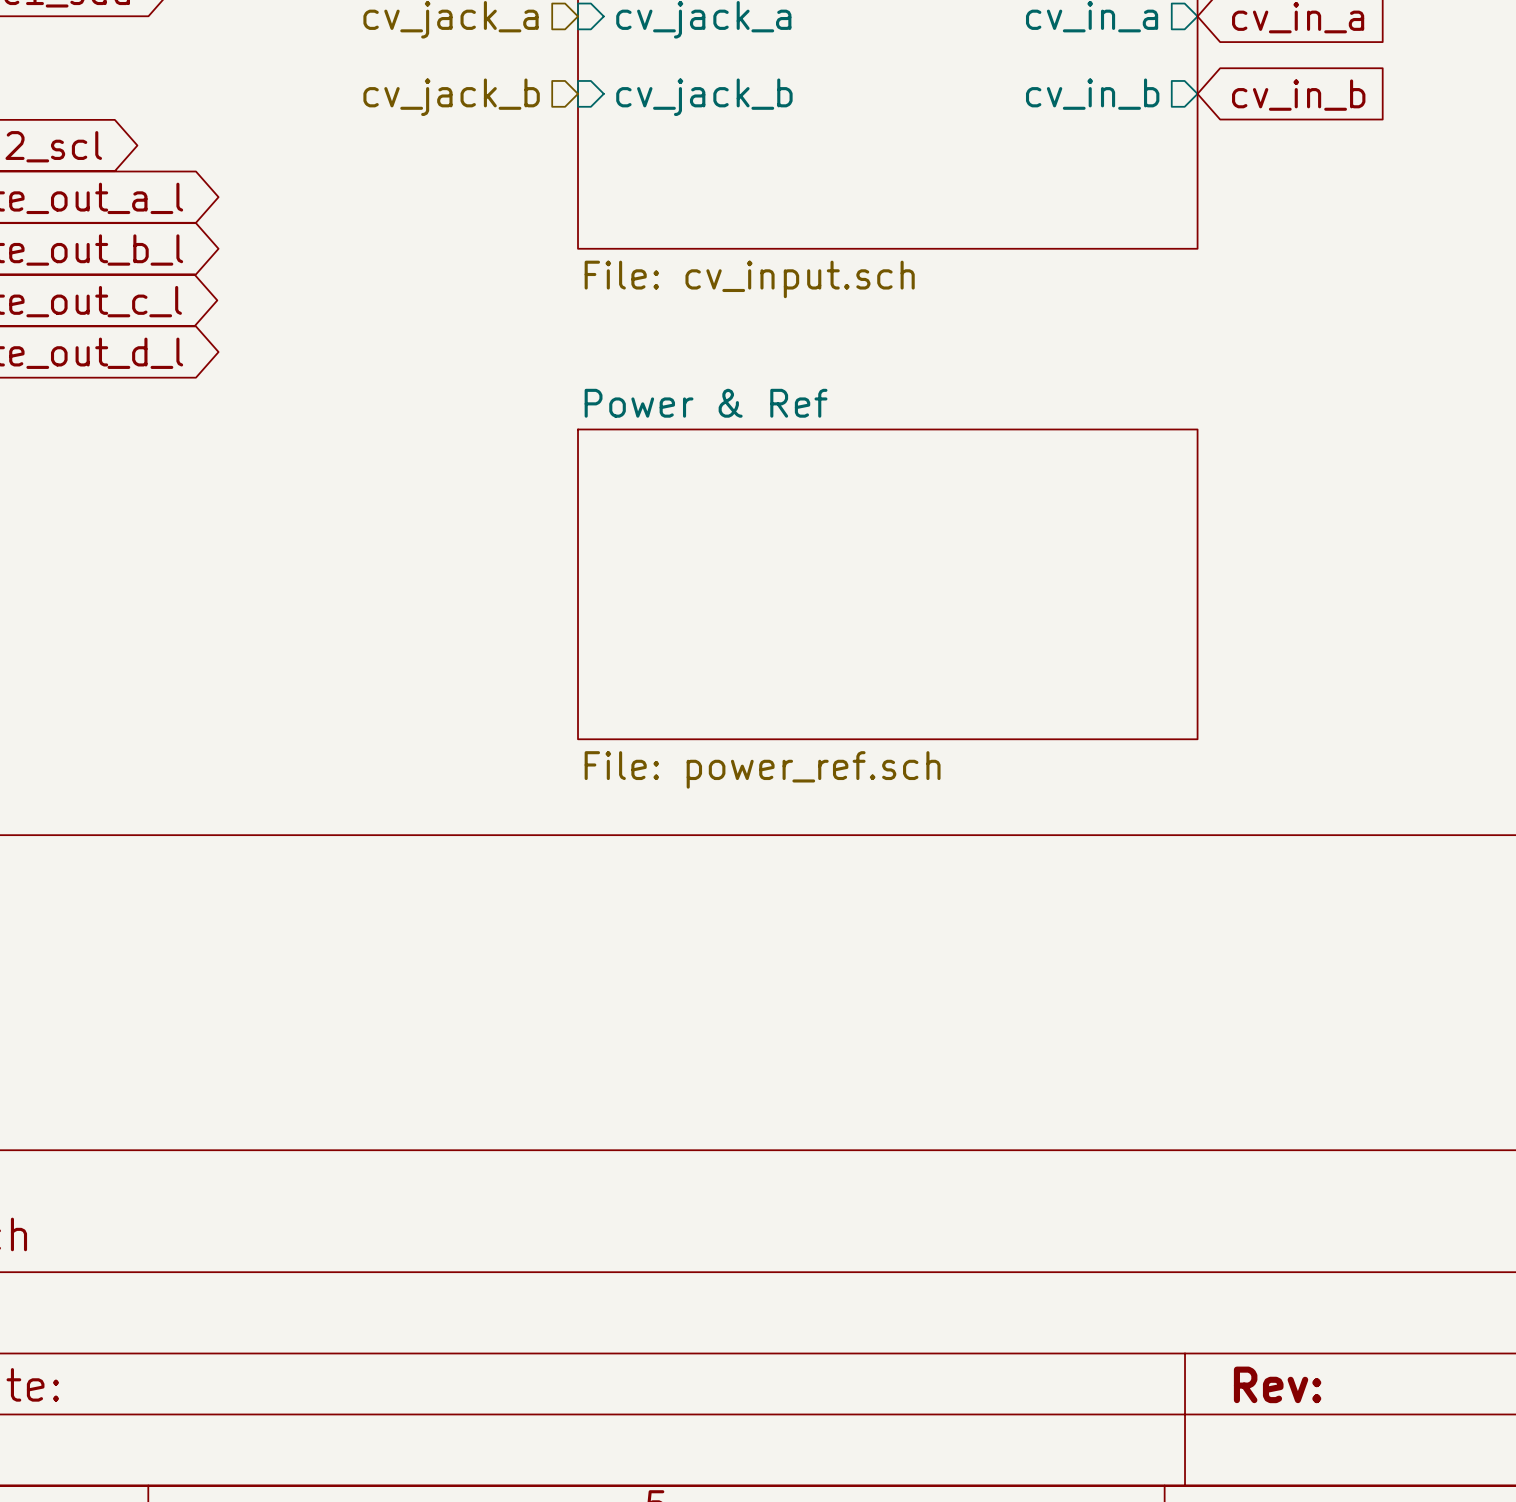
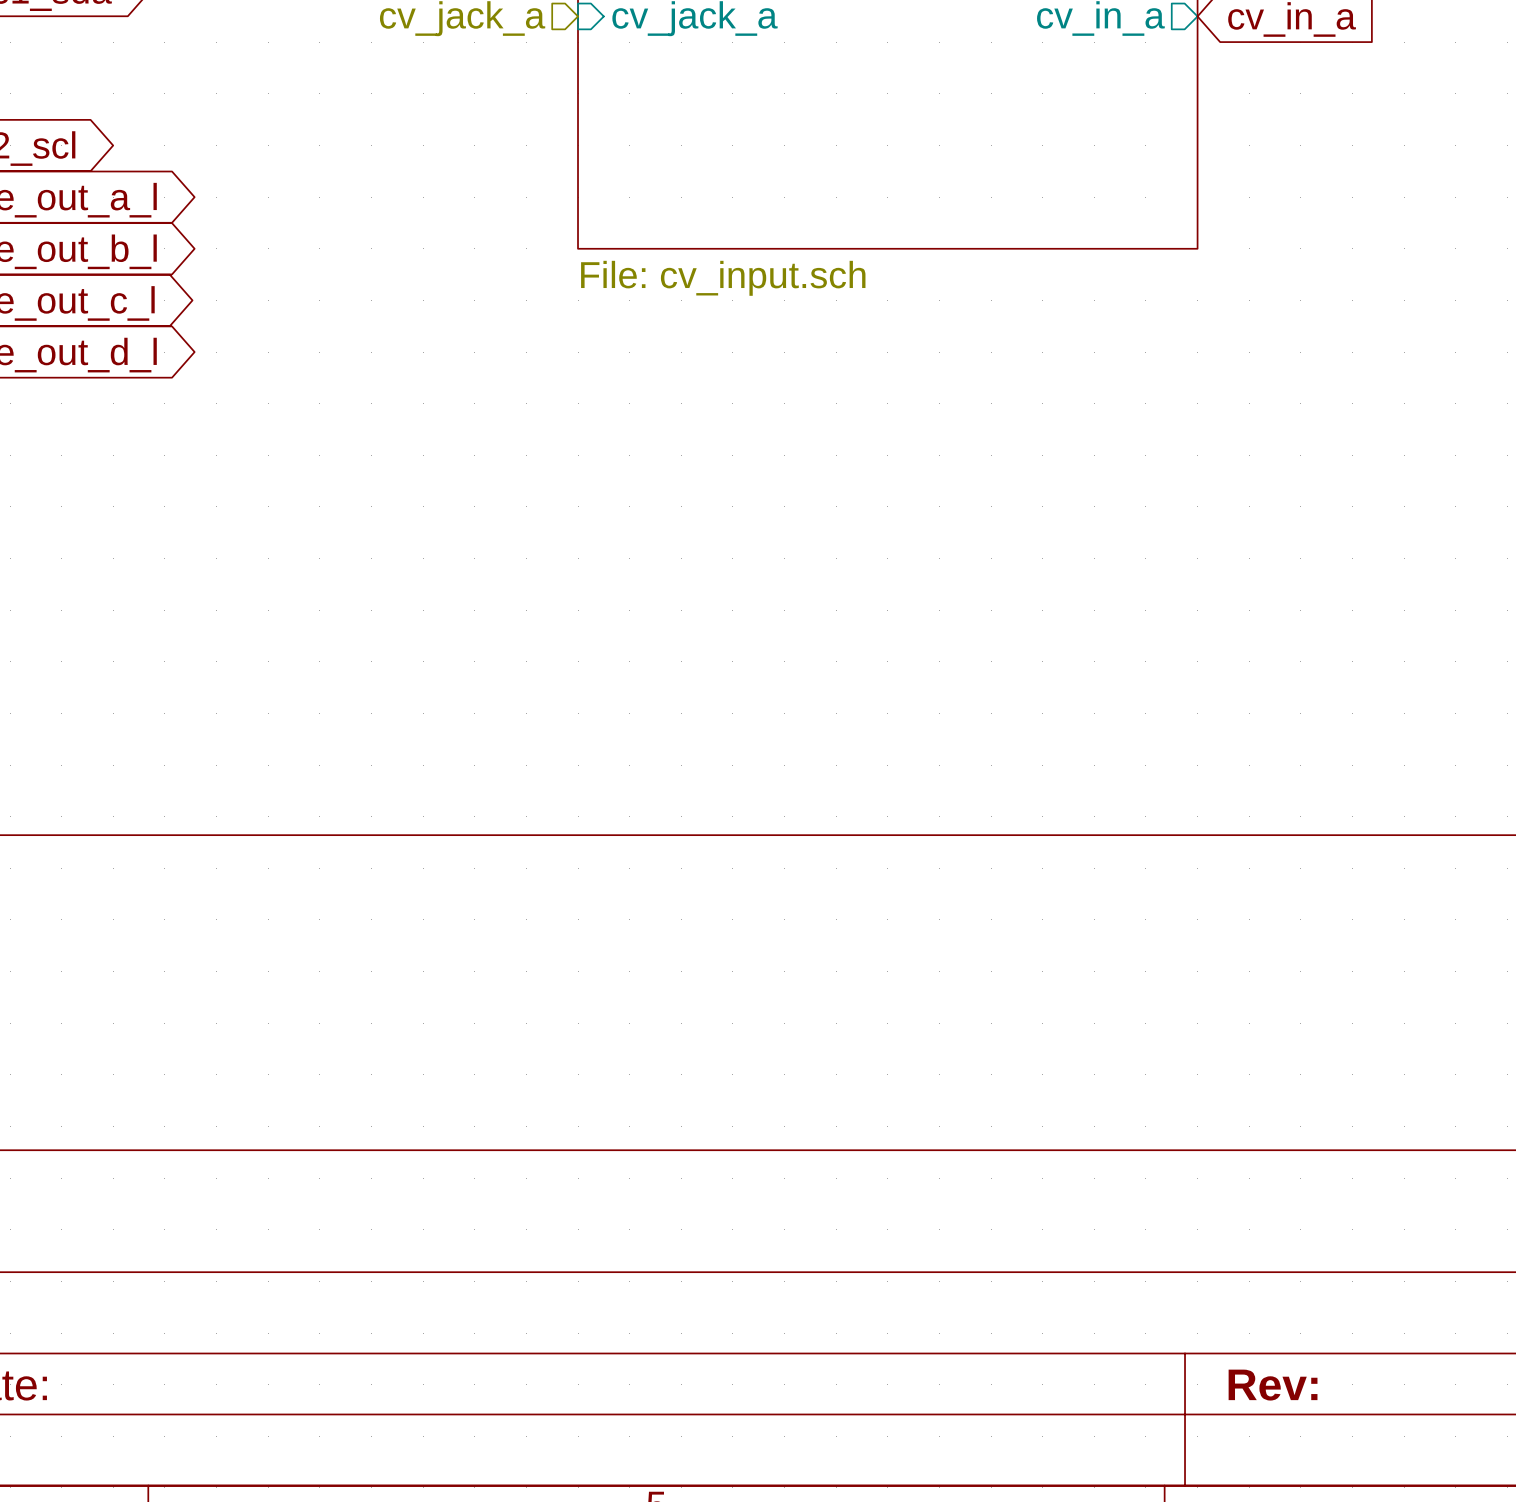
sheet pin: cv_in_b (1092, 94) -> none
global label: cv_in_b (1298, 95) -> none
hierarchical label: cv_jack_b (451, 97) -> none
sheet pin: cv_jack_b (704, 97) -> none
sheet Power & Ref: File: power_ref.sch (887, 584) -> none

